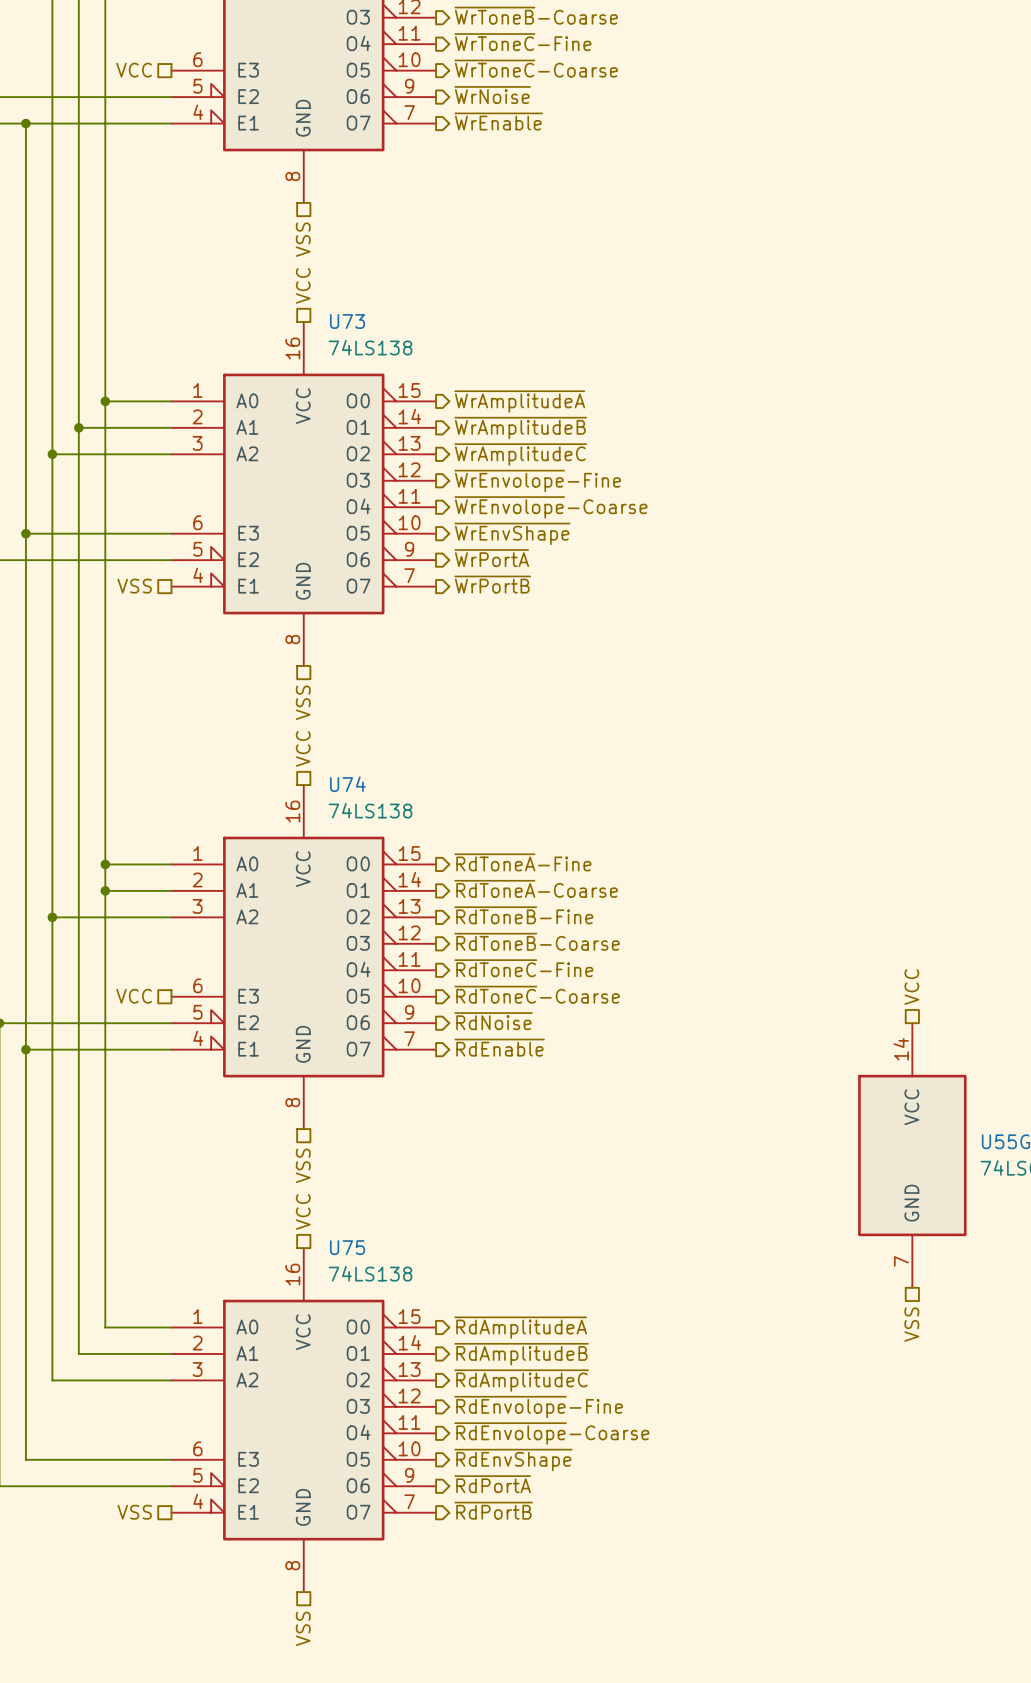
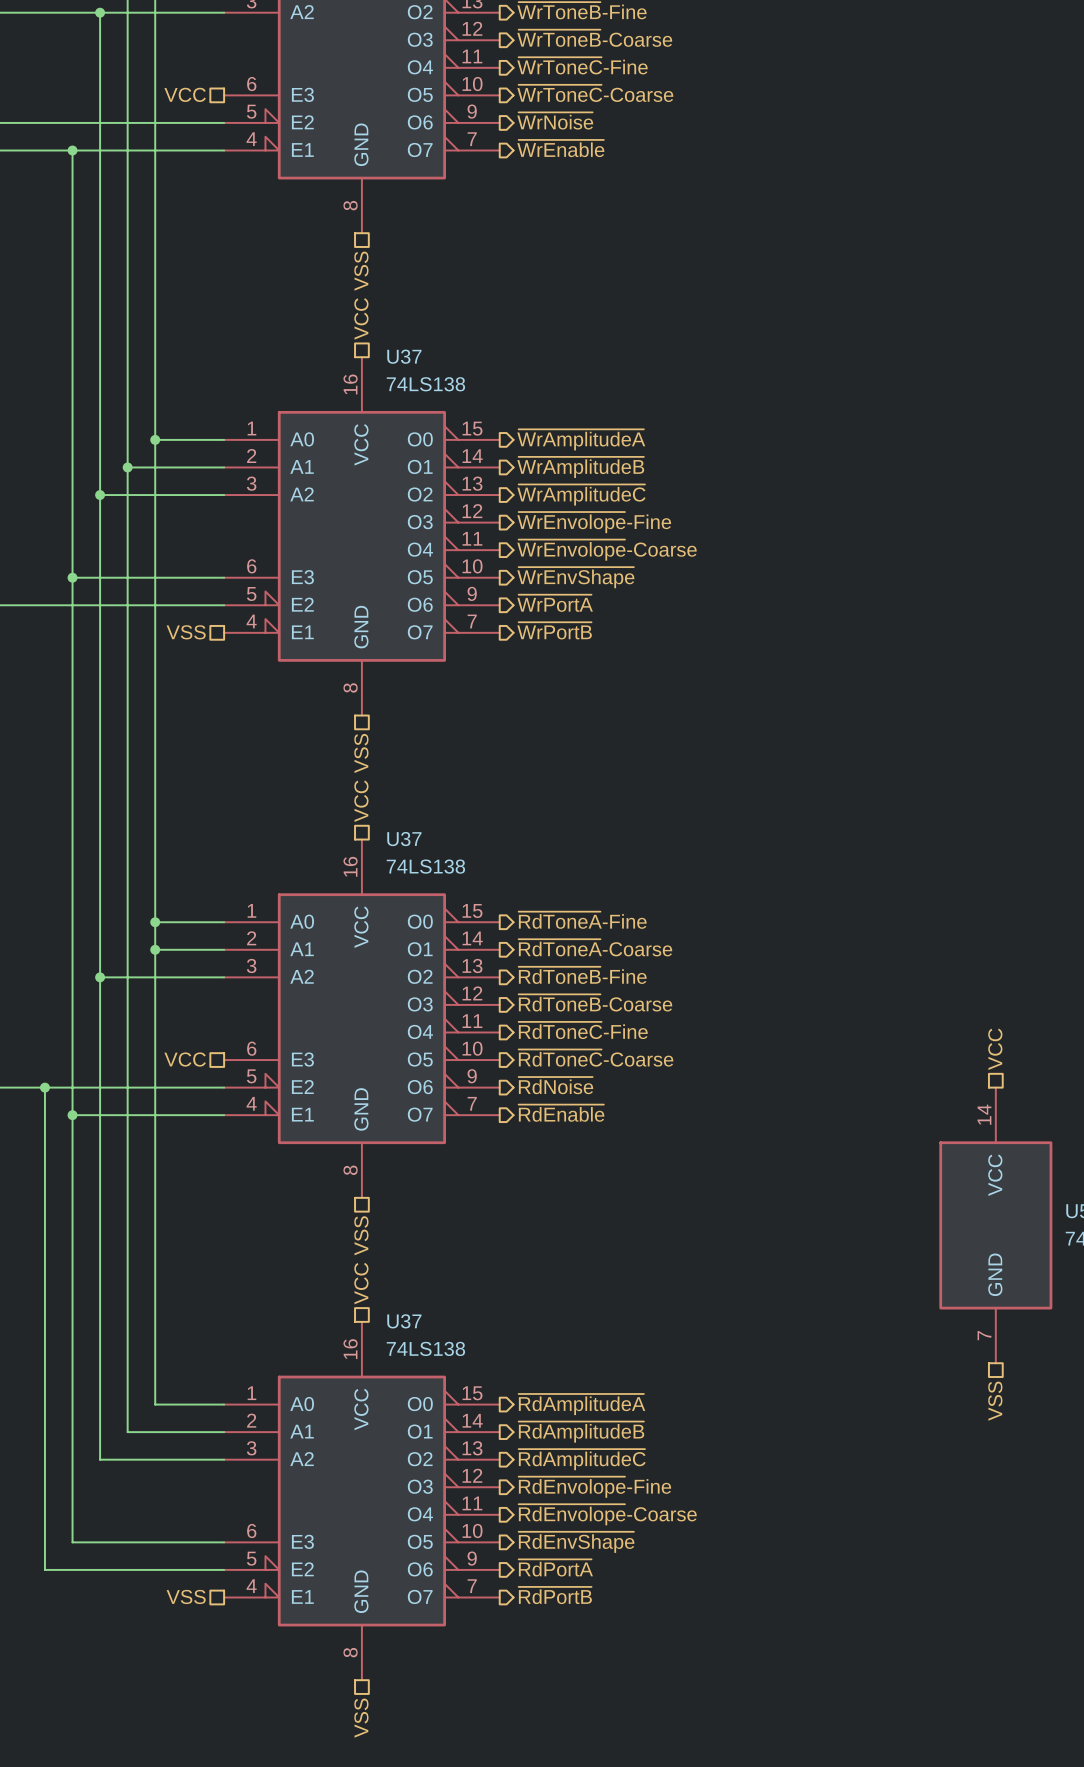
U73 name: U73 (347, 321) -> U37 (404, 356)
U74 name: U74 (347, 784) -> U37 (404, 839)
U75 name: U75 (347, 1247) -> U37 (404, 1321)

